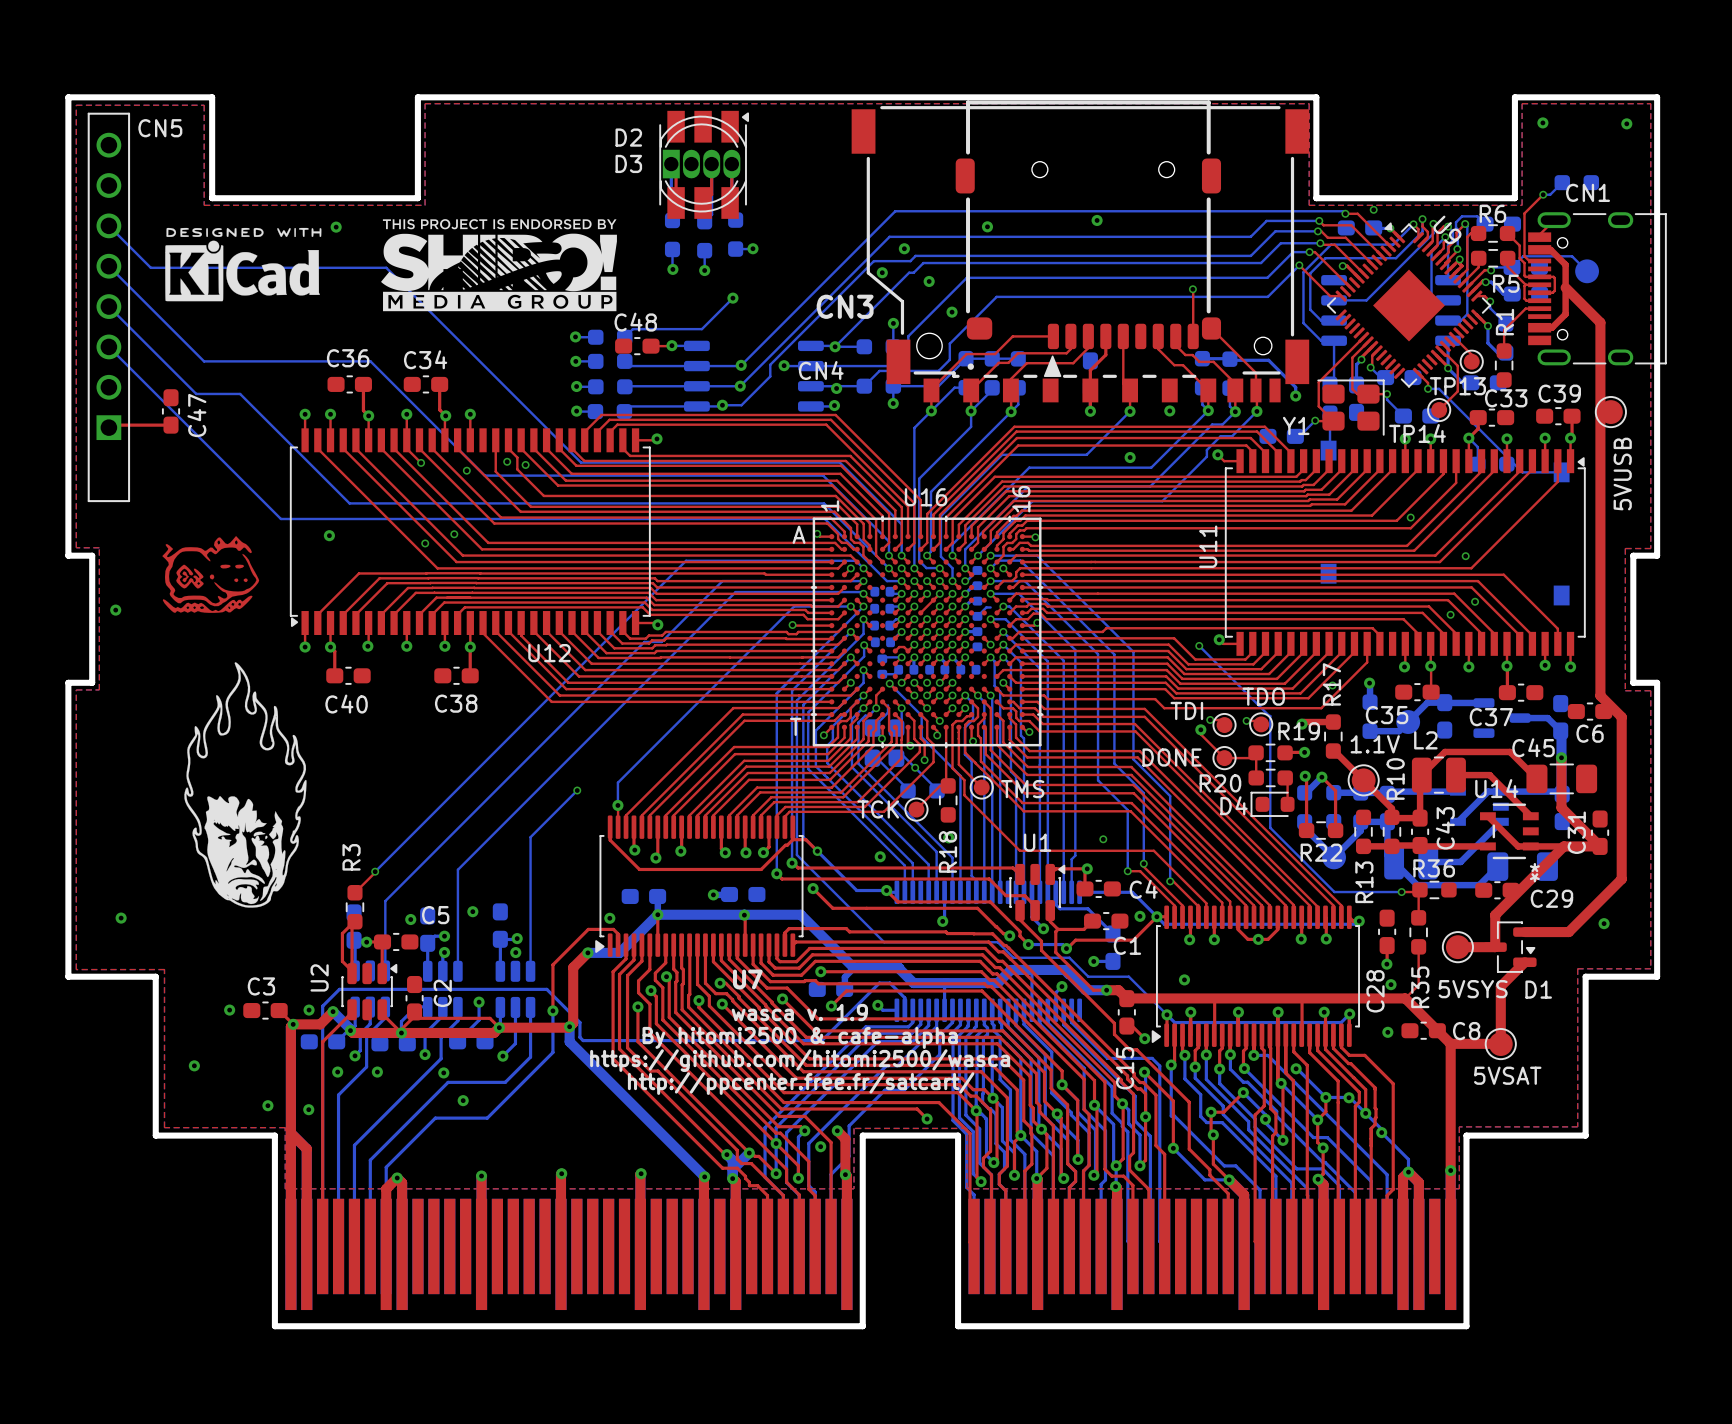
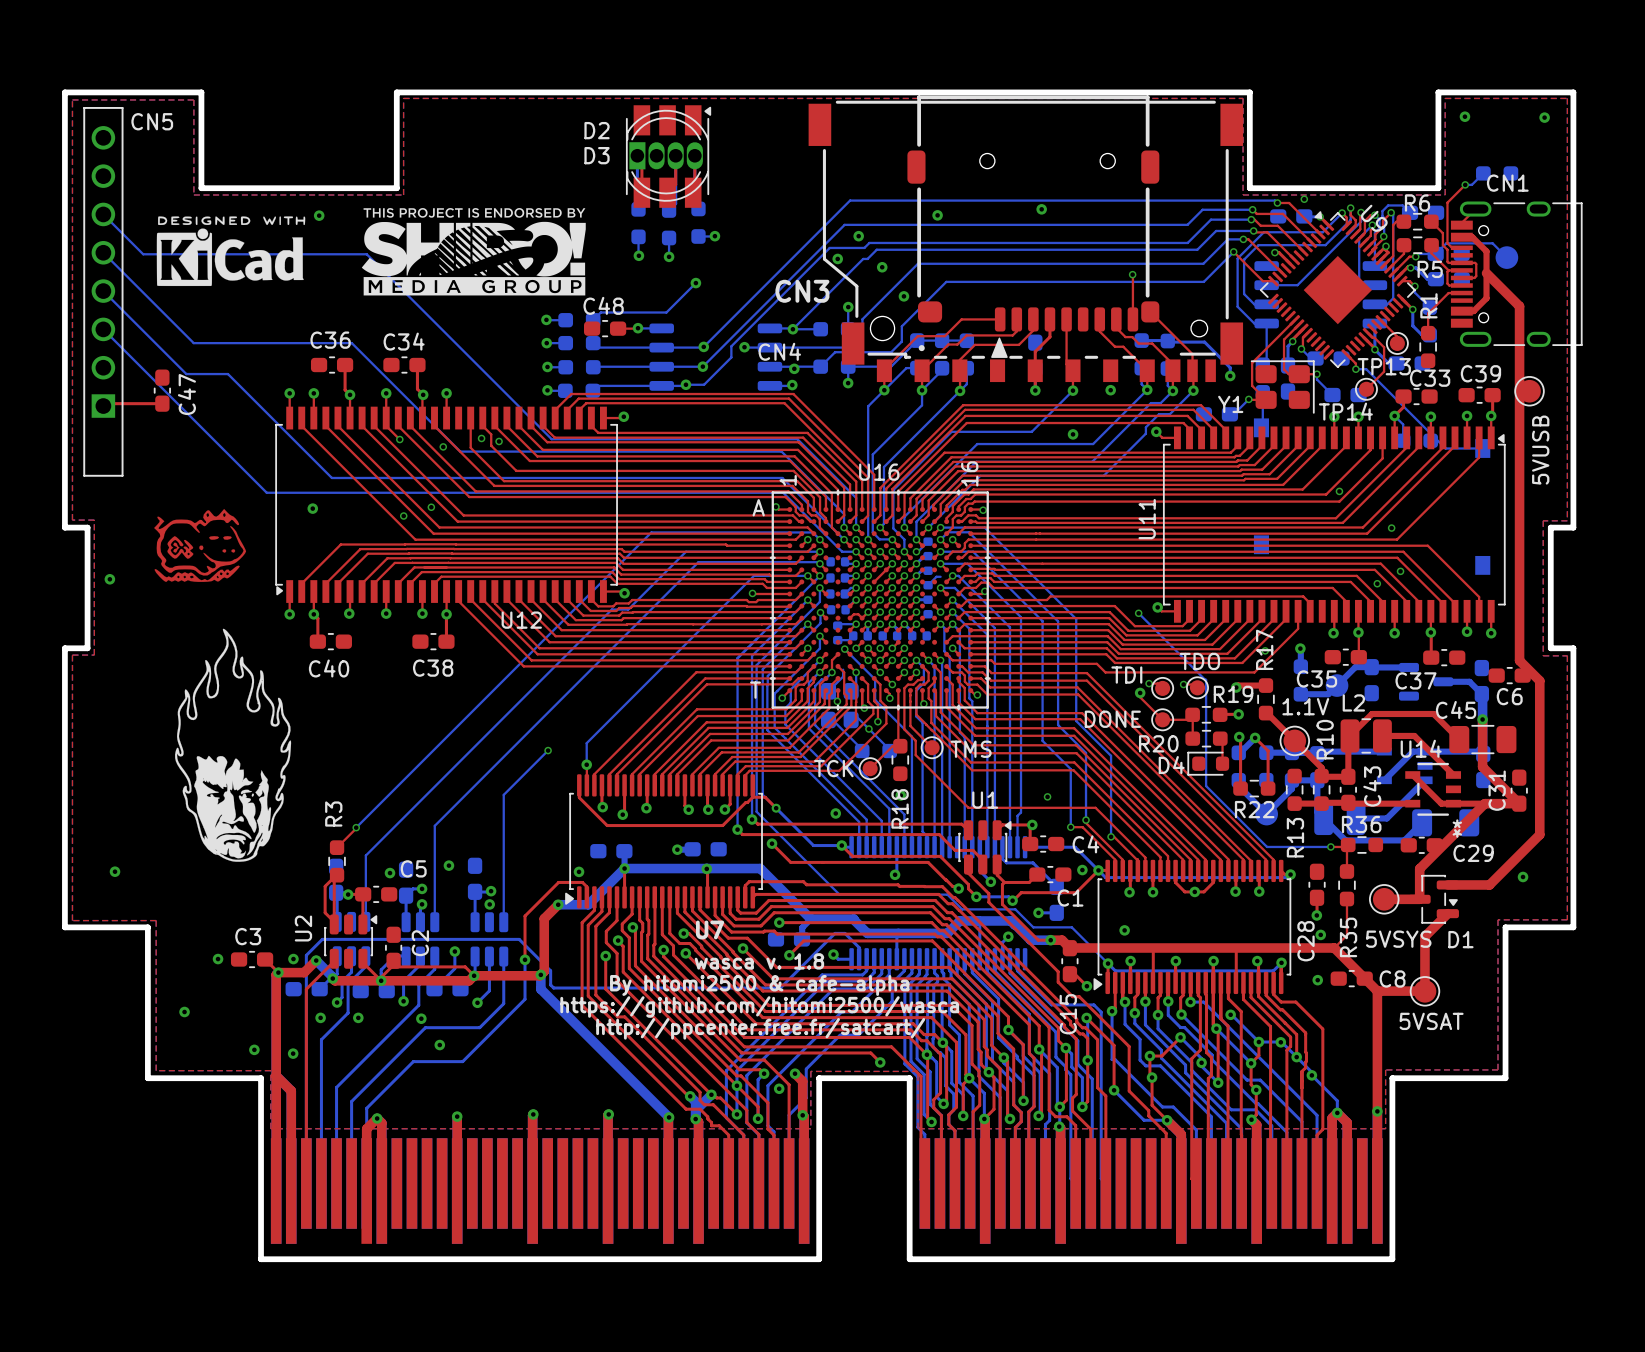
text: wasca v. 1.9 (799, 1012) -> wasca v. 1.8 (759, 961)

